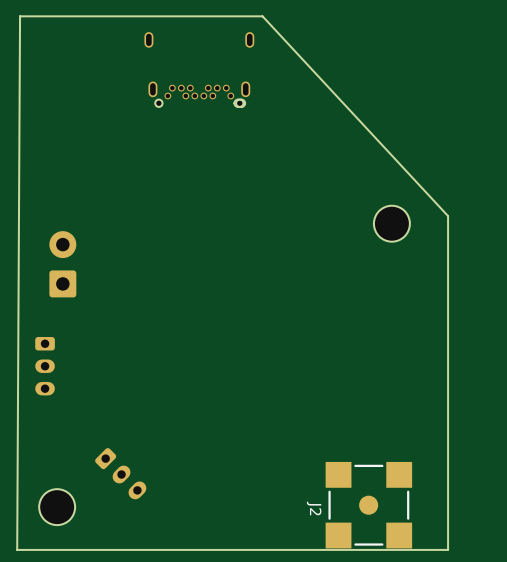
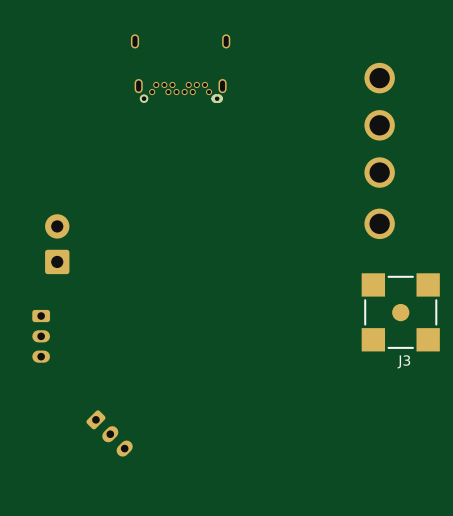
board edge: (262, 16) (448, 216) (448, 549) (17, 549) (20, 16) (262, 16) -> none
part: none -> (379, 78)
part: none -> (379, 125)
part: none -> (379, 172)
part: (391, 223) -> none
part: none -> (379, 223)
J3: none -> (400, 312)
J2: (368, 505) -> none
part: (57, 507) -> none

